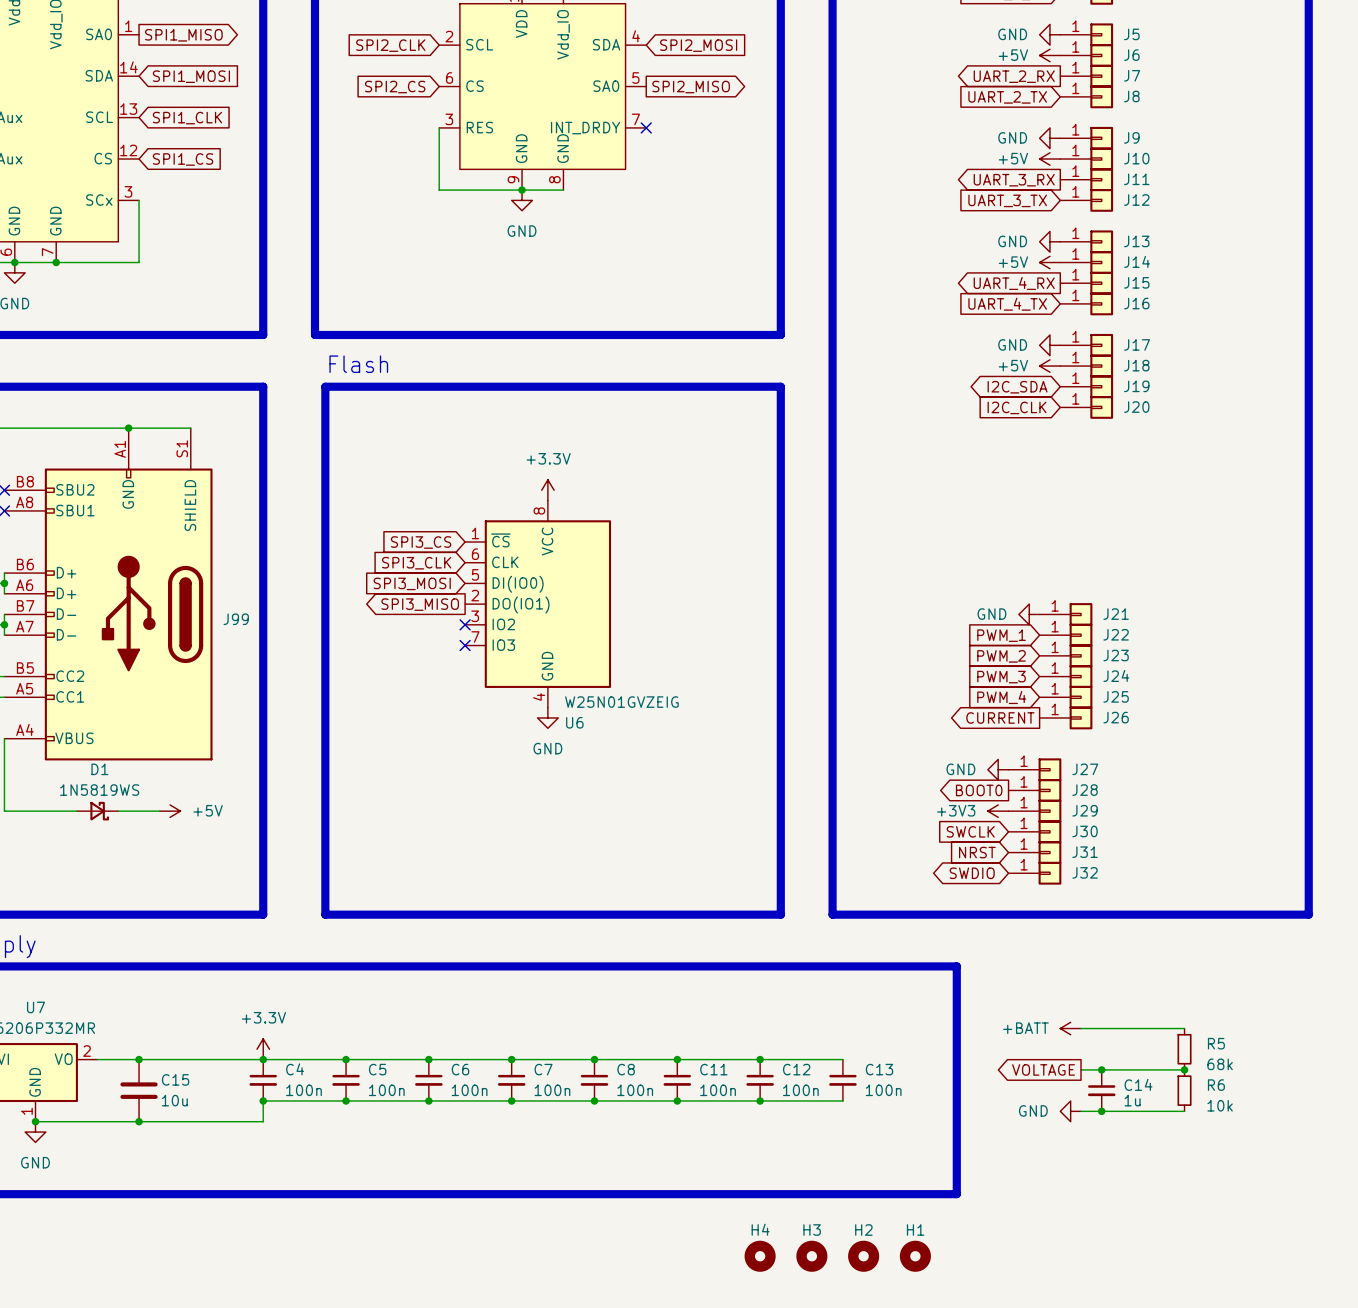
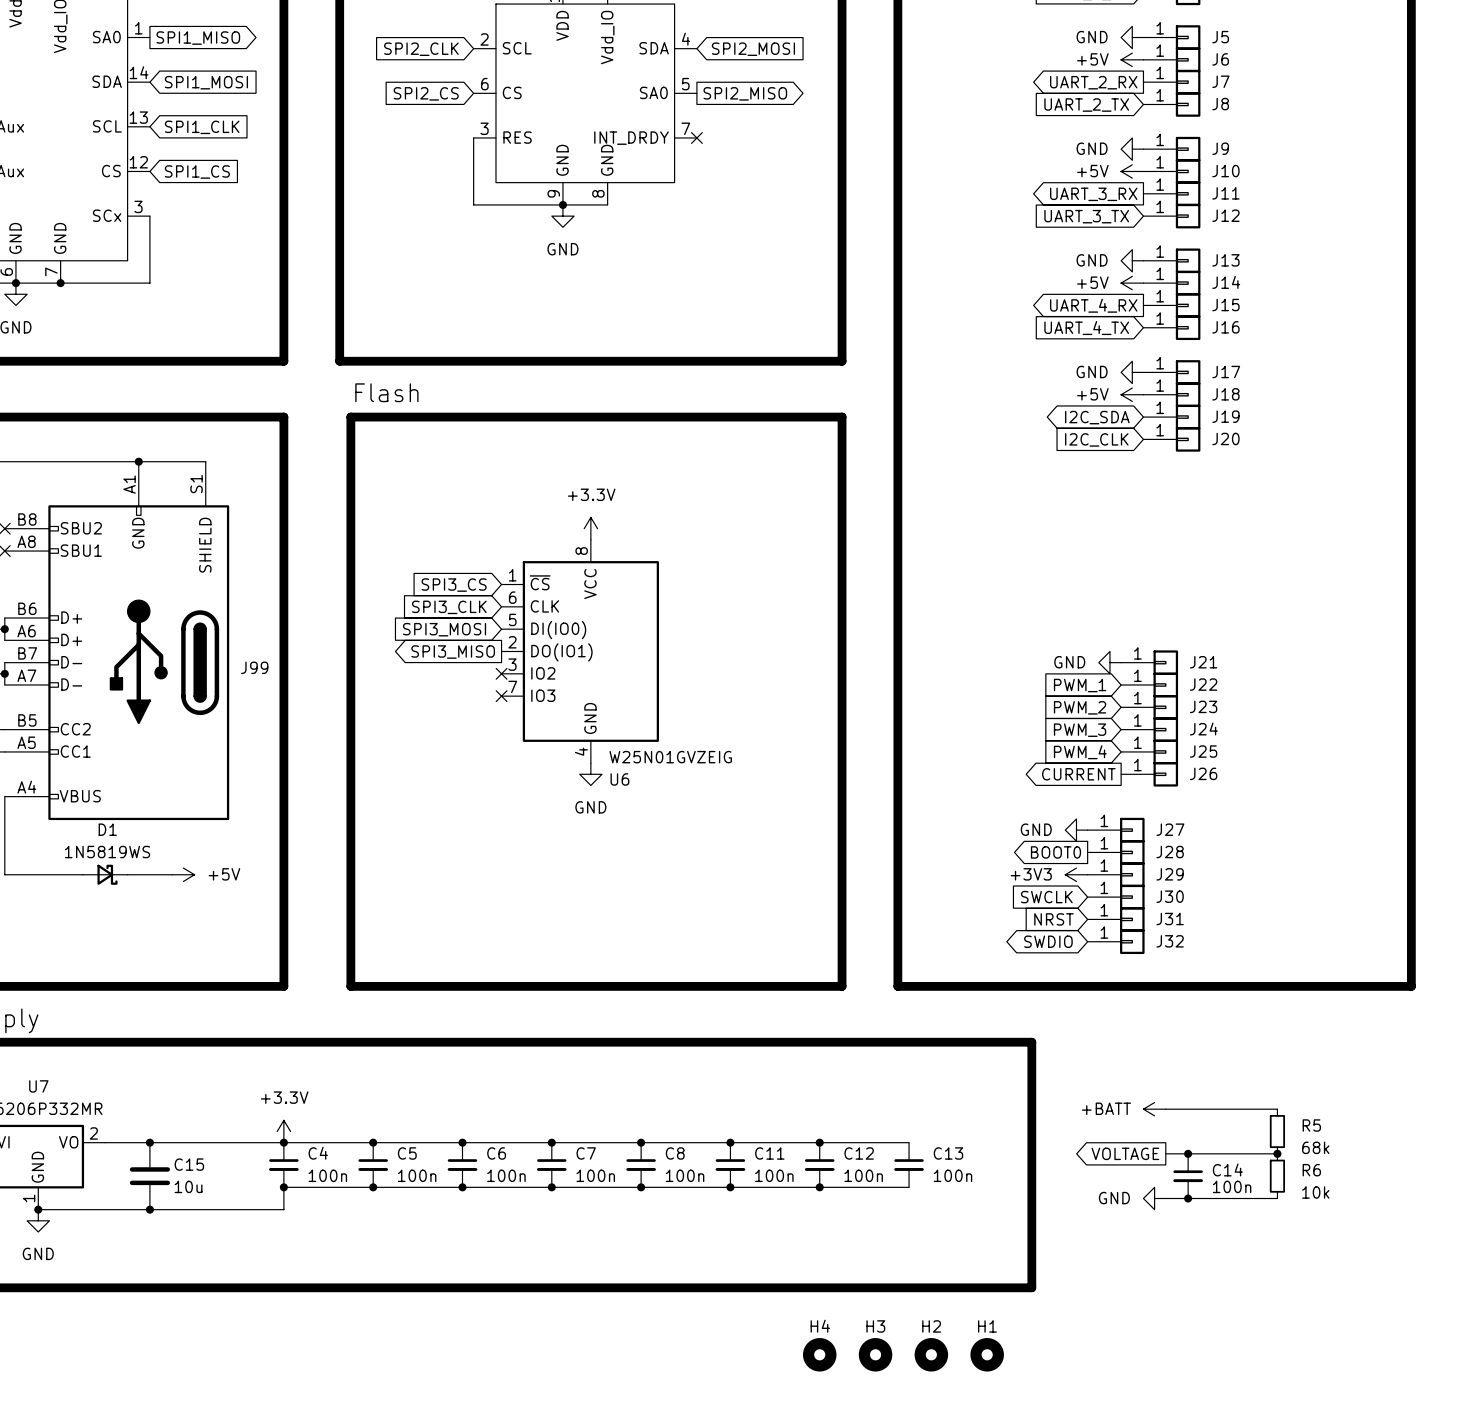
C14 value: 1u (1132, 1100) -> 100n (1232, 1186)

